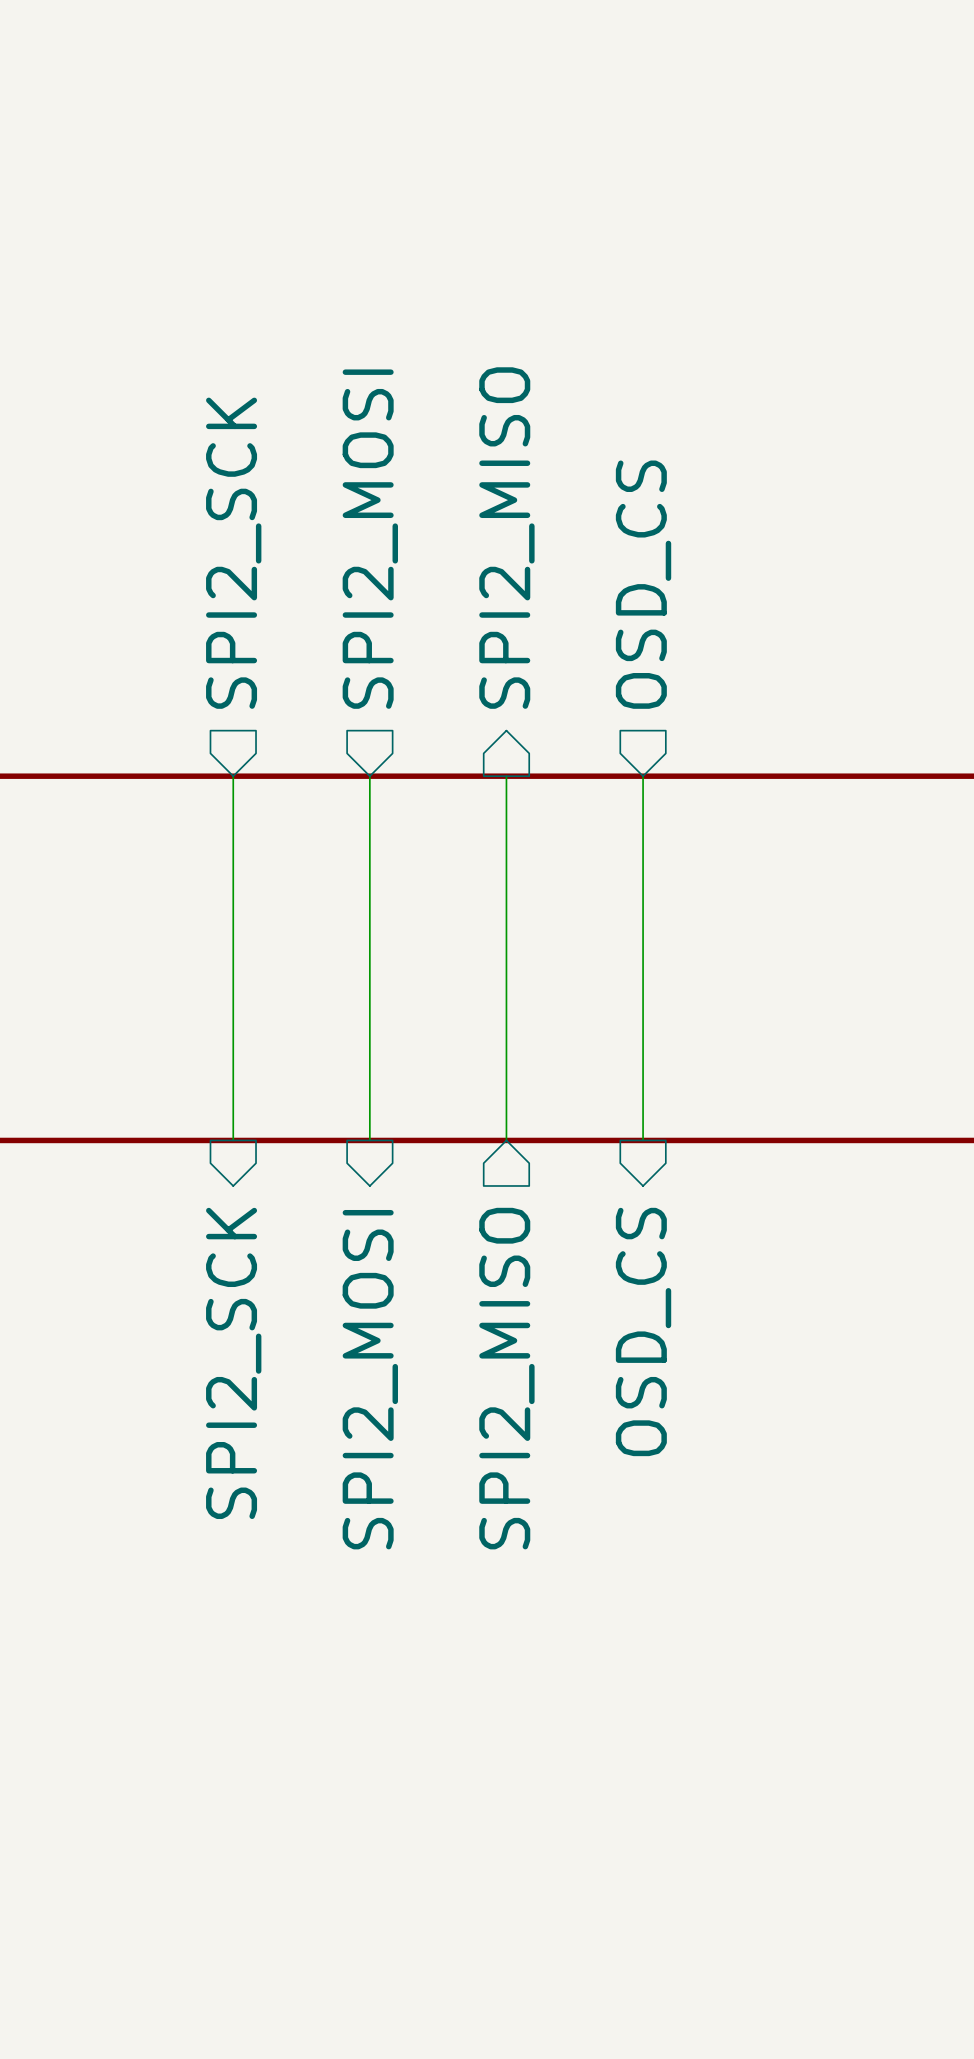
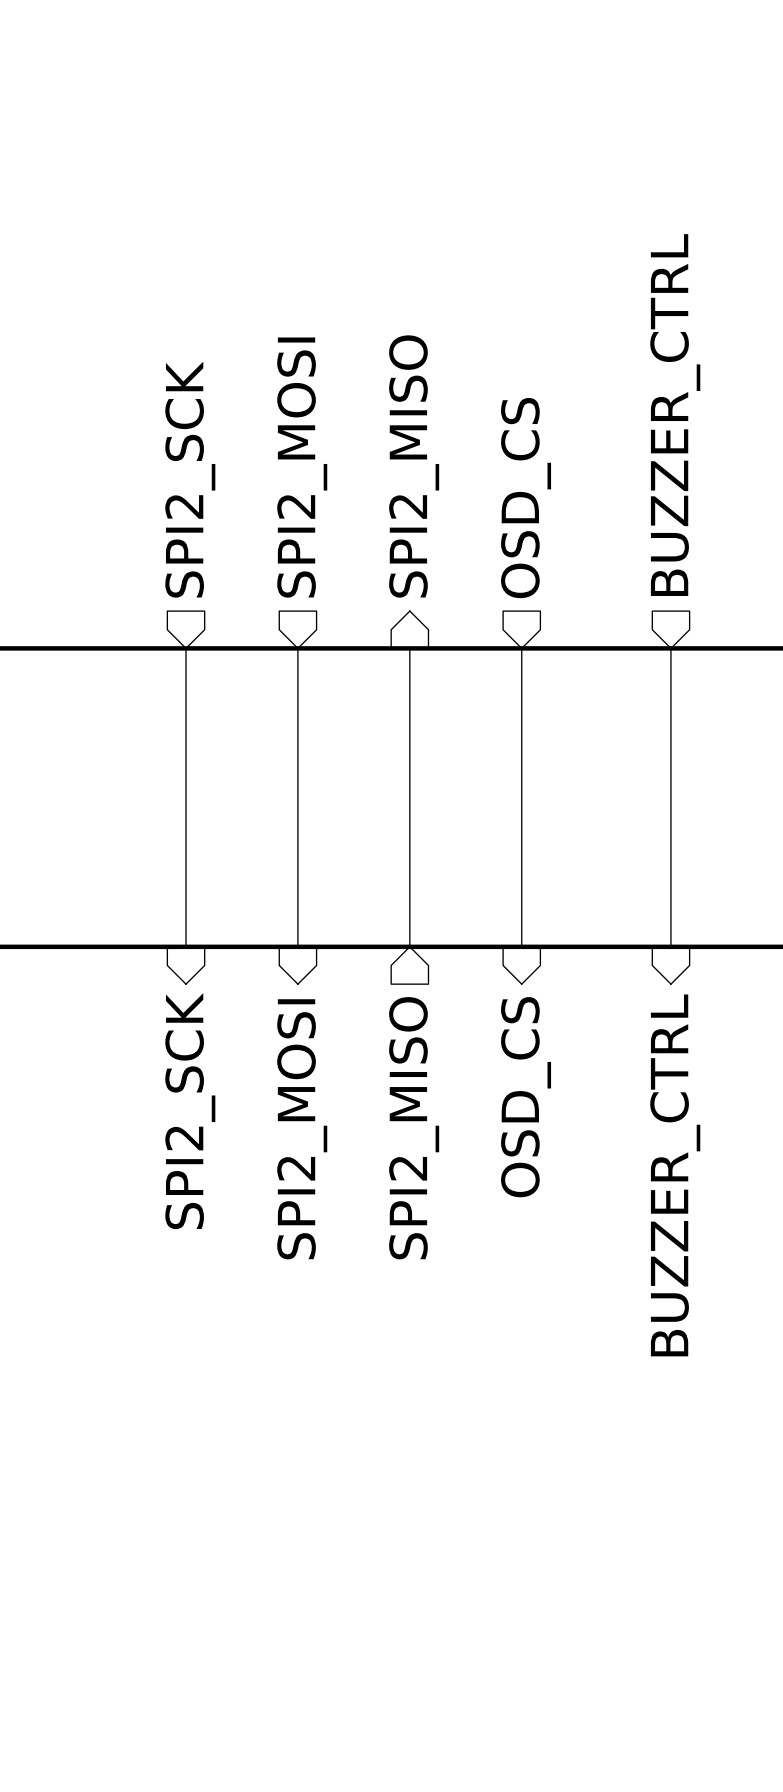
sheet pin: none -> BUZZER_CTRL (675, 415)
wire: none -> (670, 648) (670, 946)
sheet pin: none -> BUZZER_CTRL (675, 1175)

